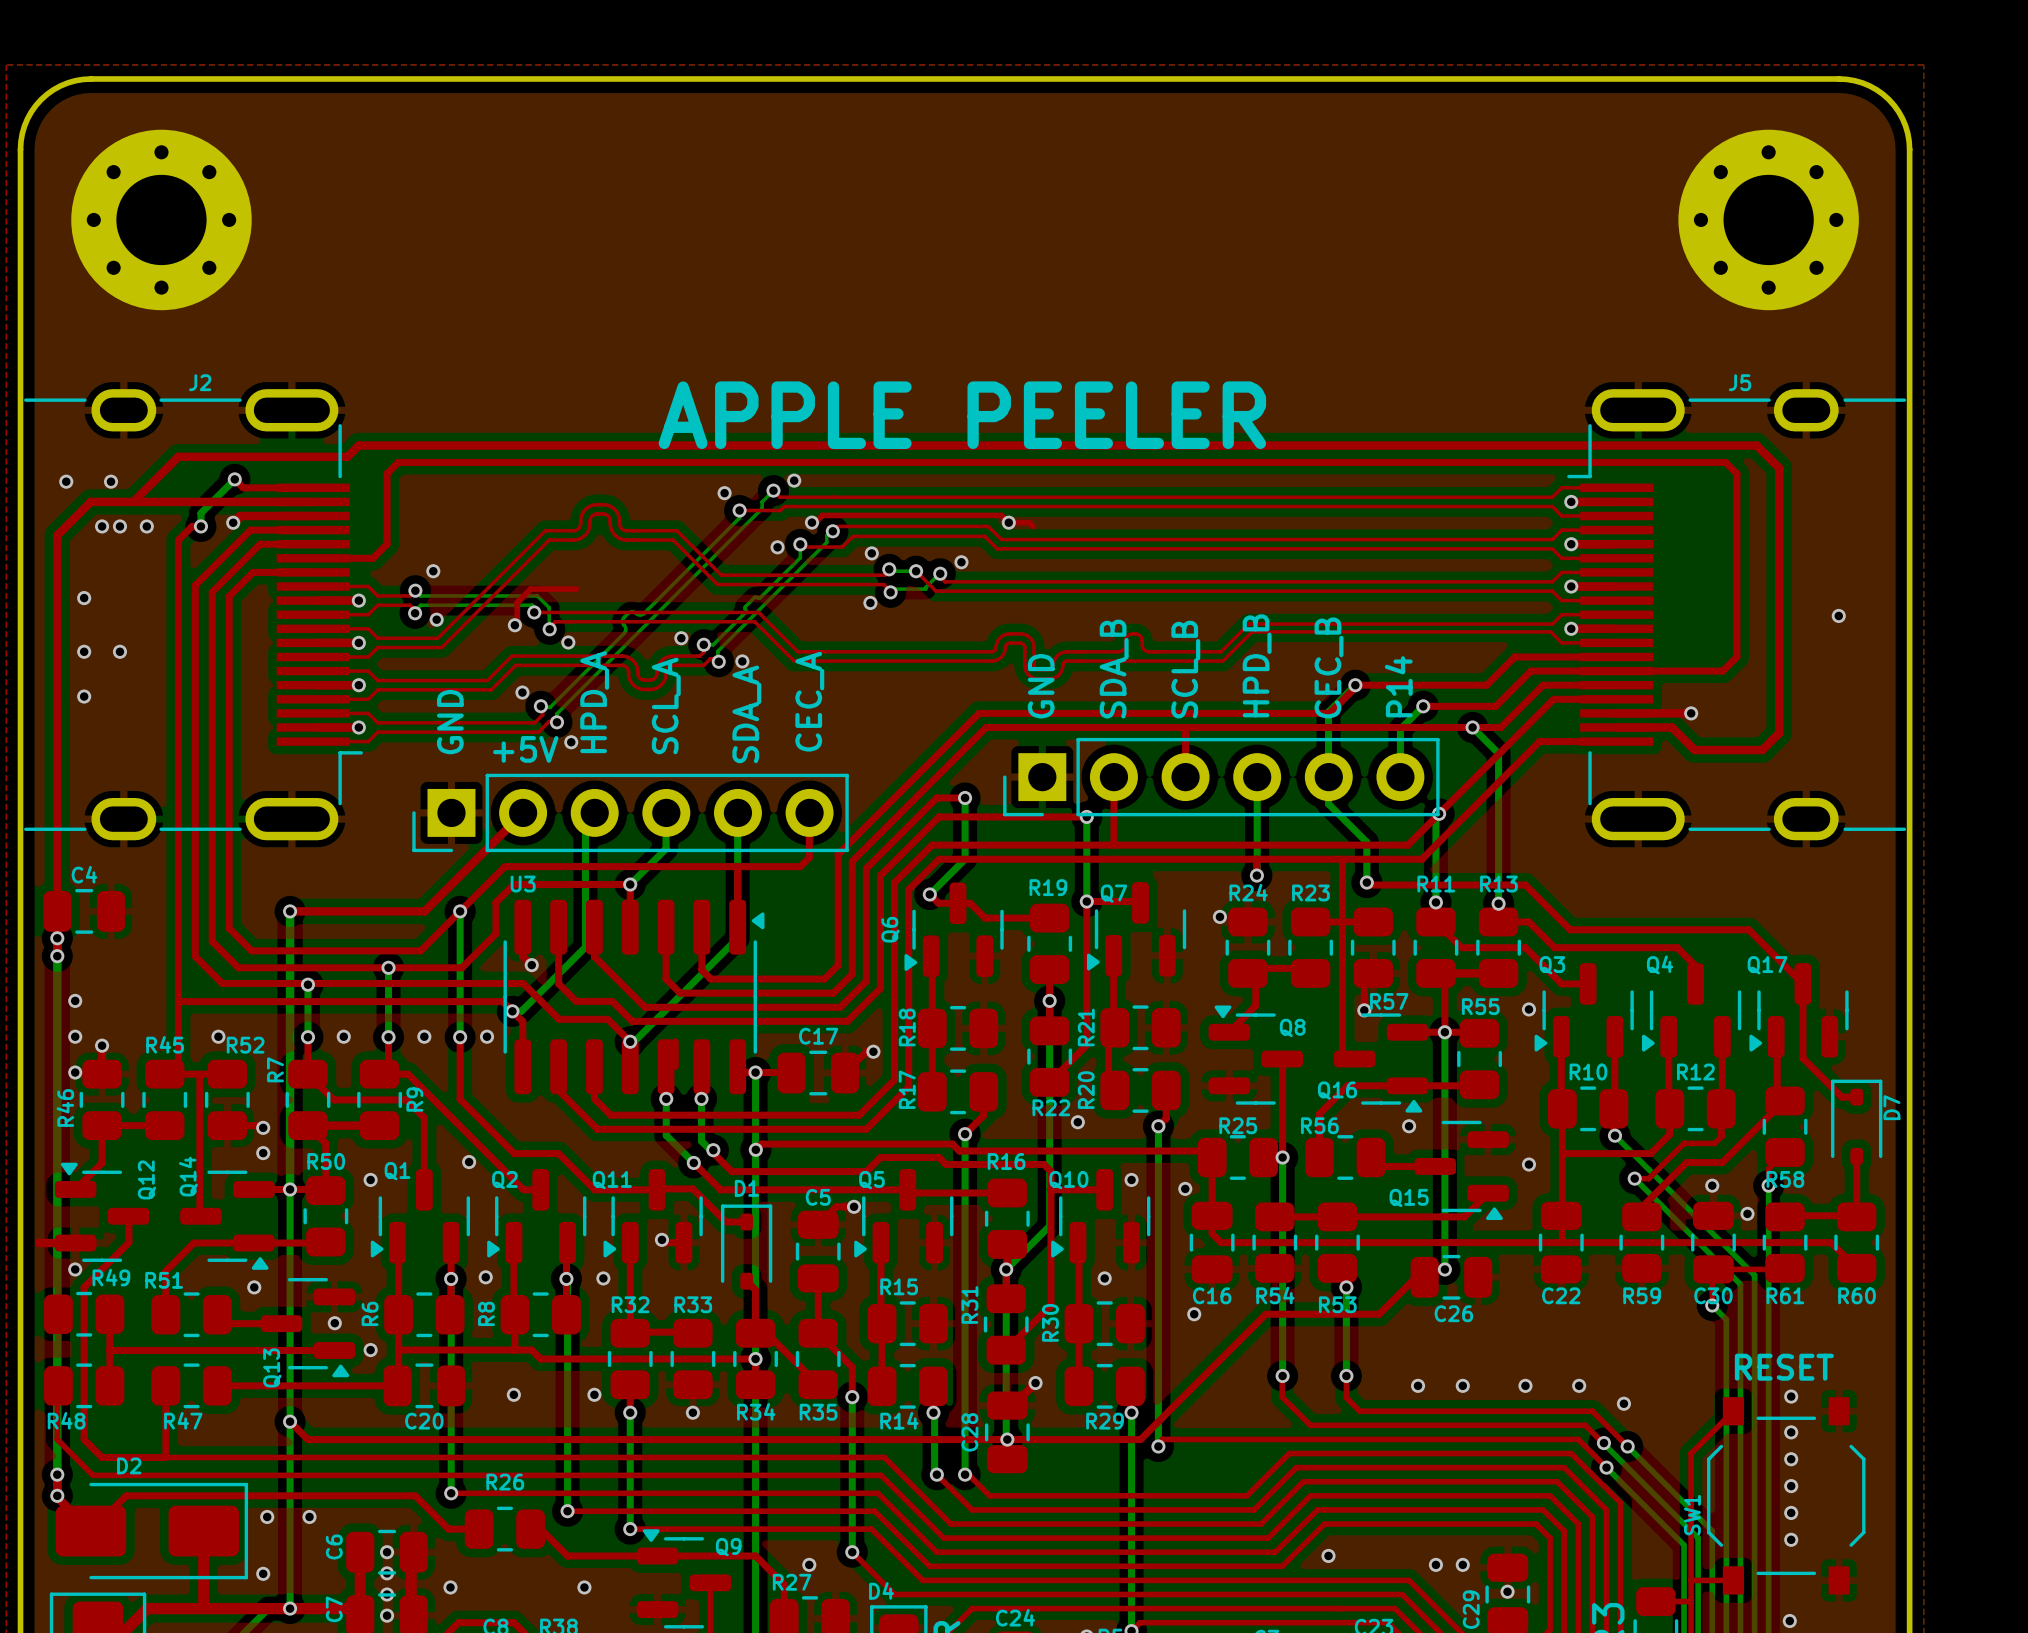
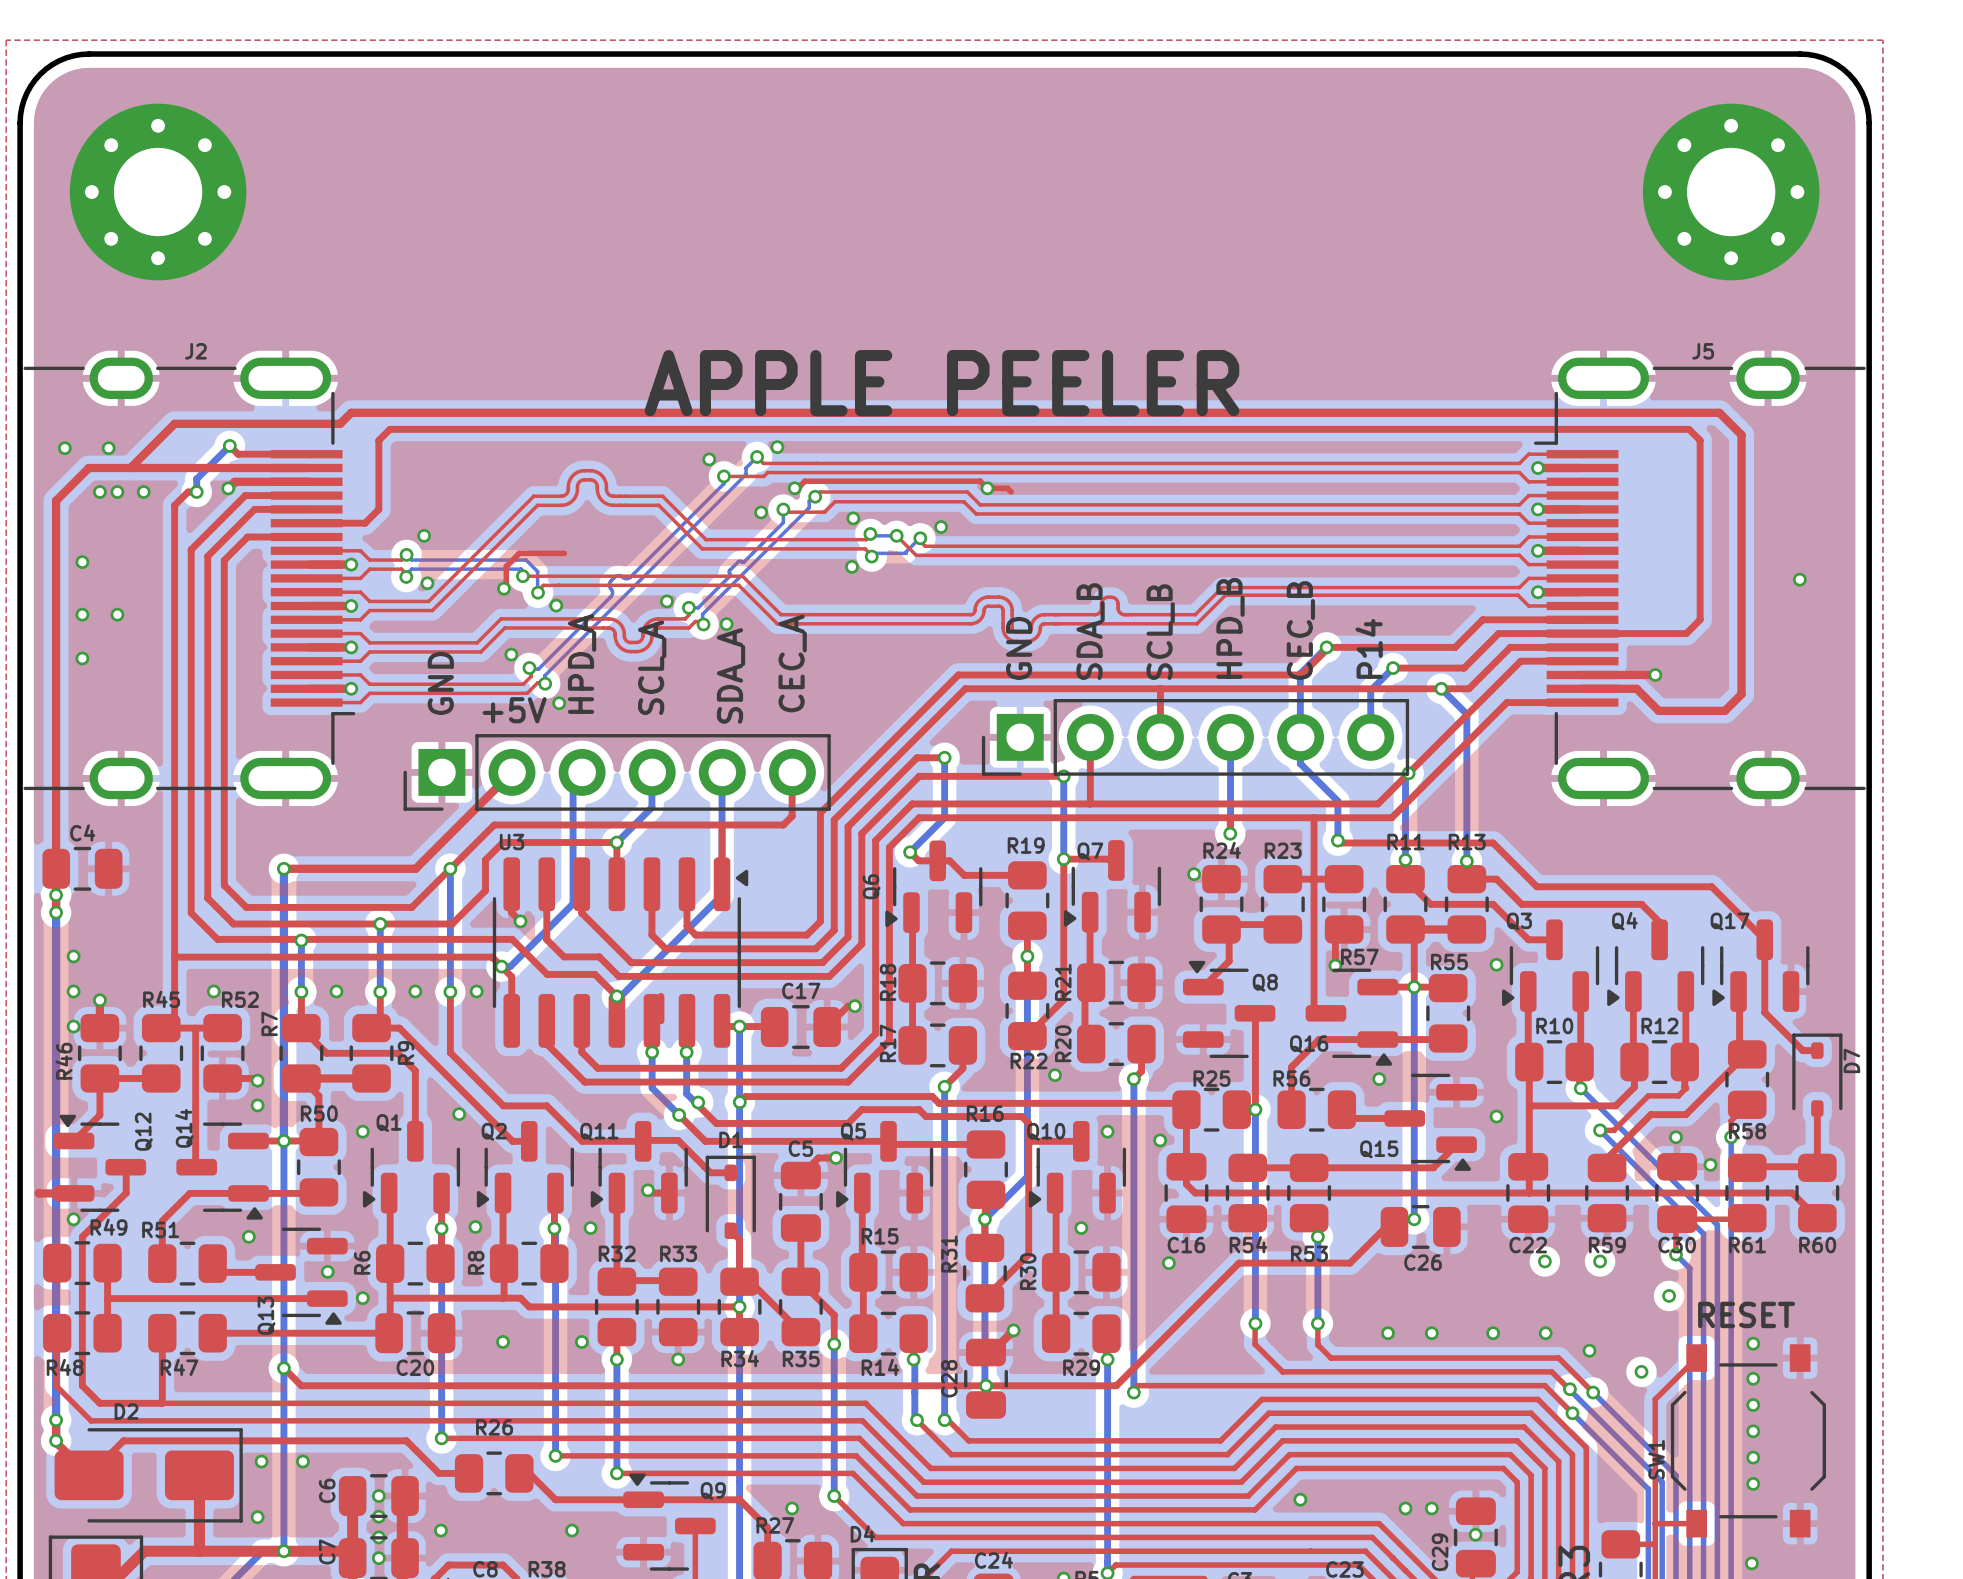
via: none -> (1544, 1261)
via: none -> (1600, 1261)
via: none -> (1669, 1295)
via: none -> (1641, 1371)

